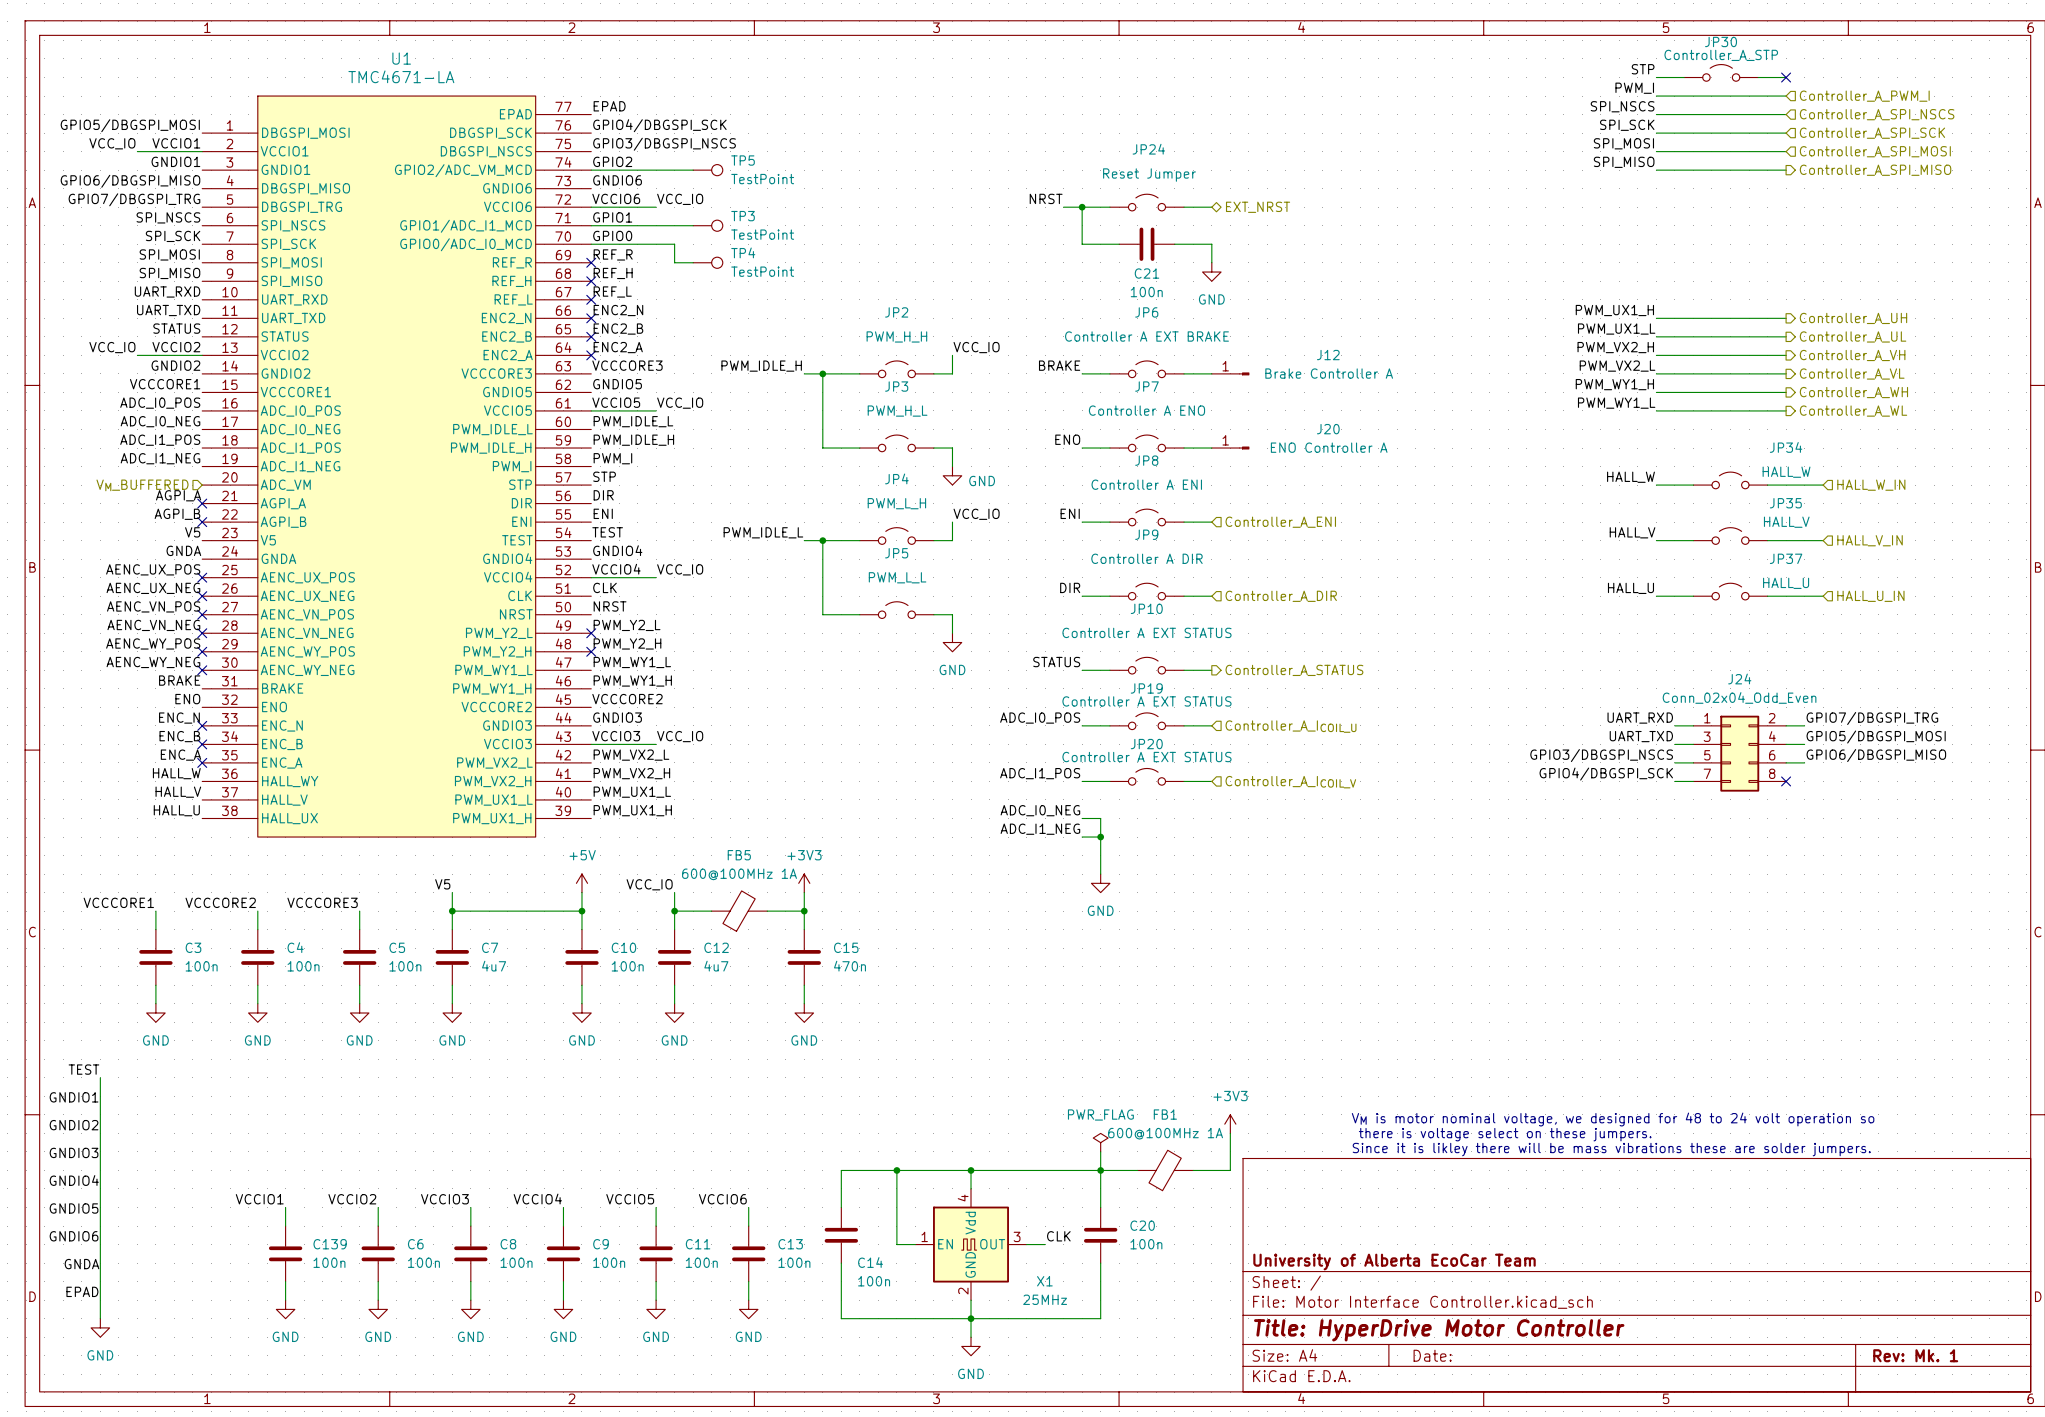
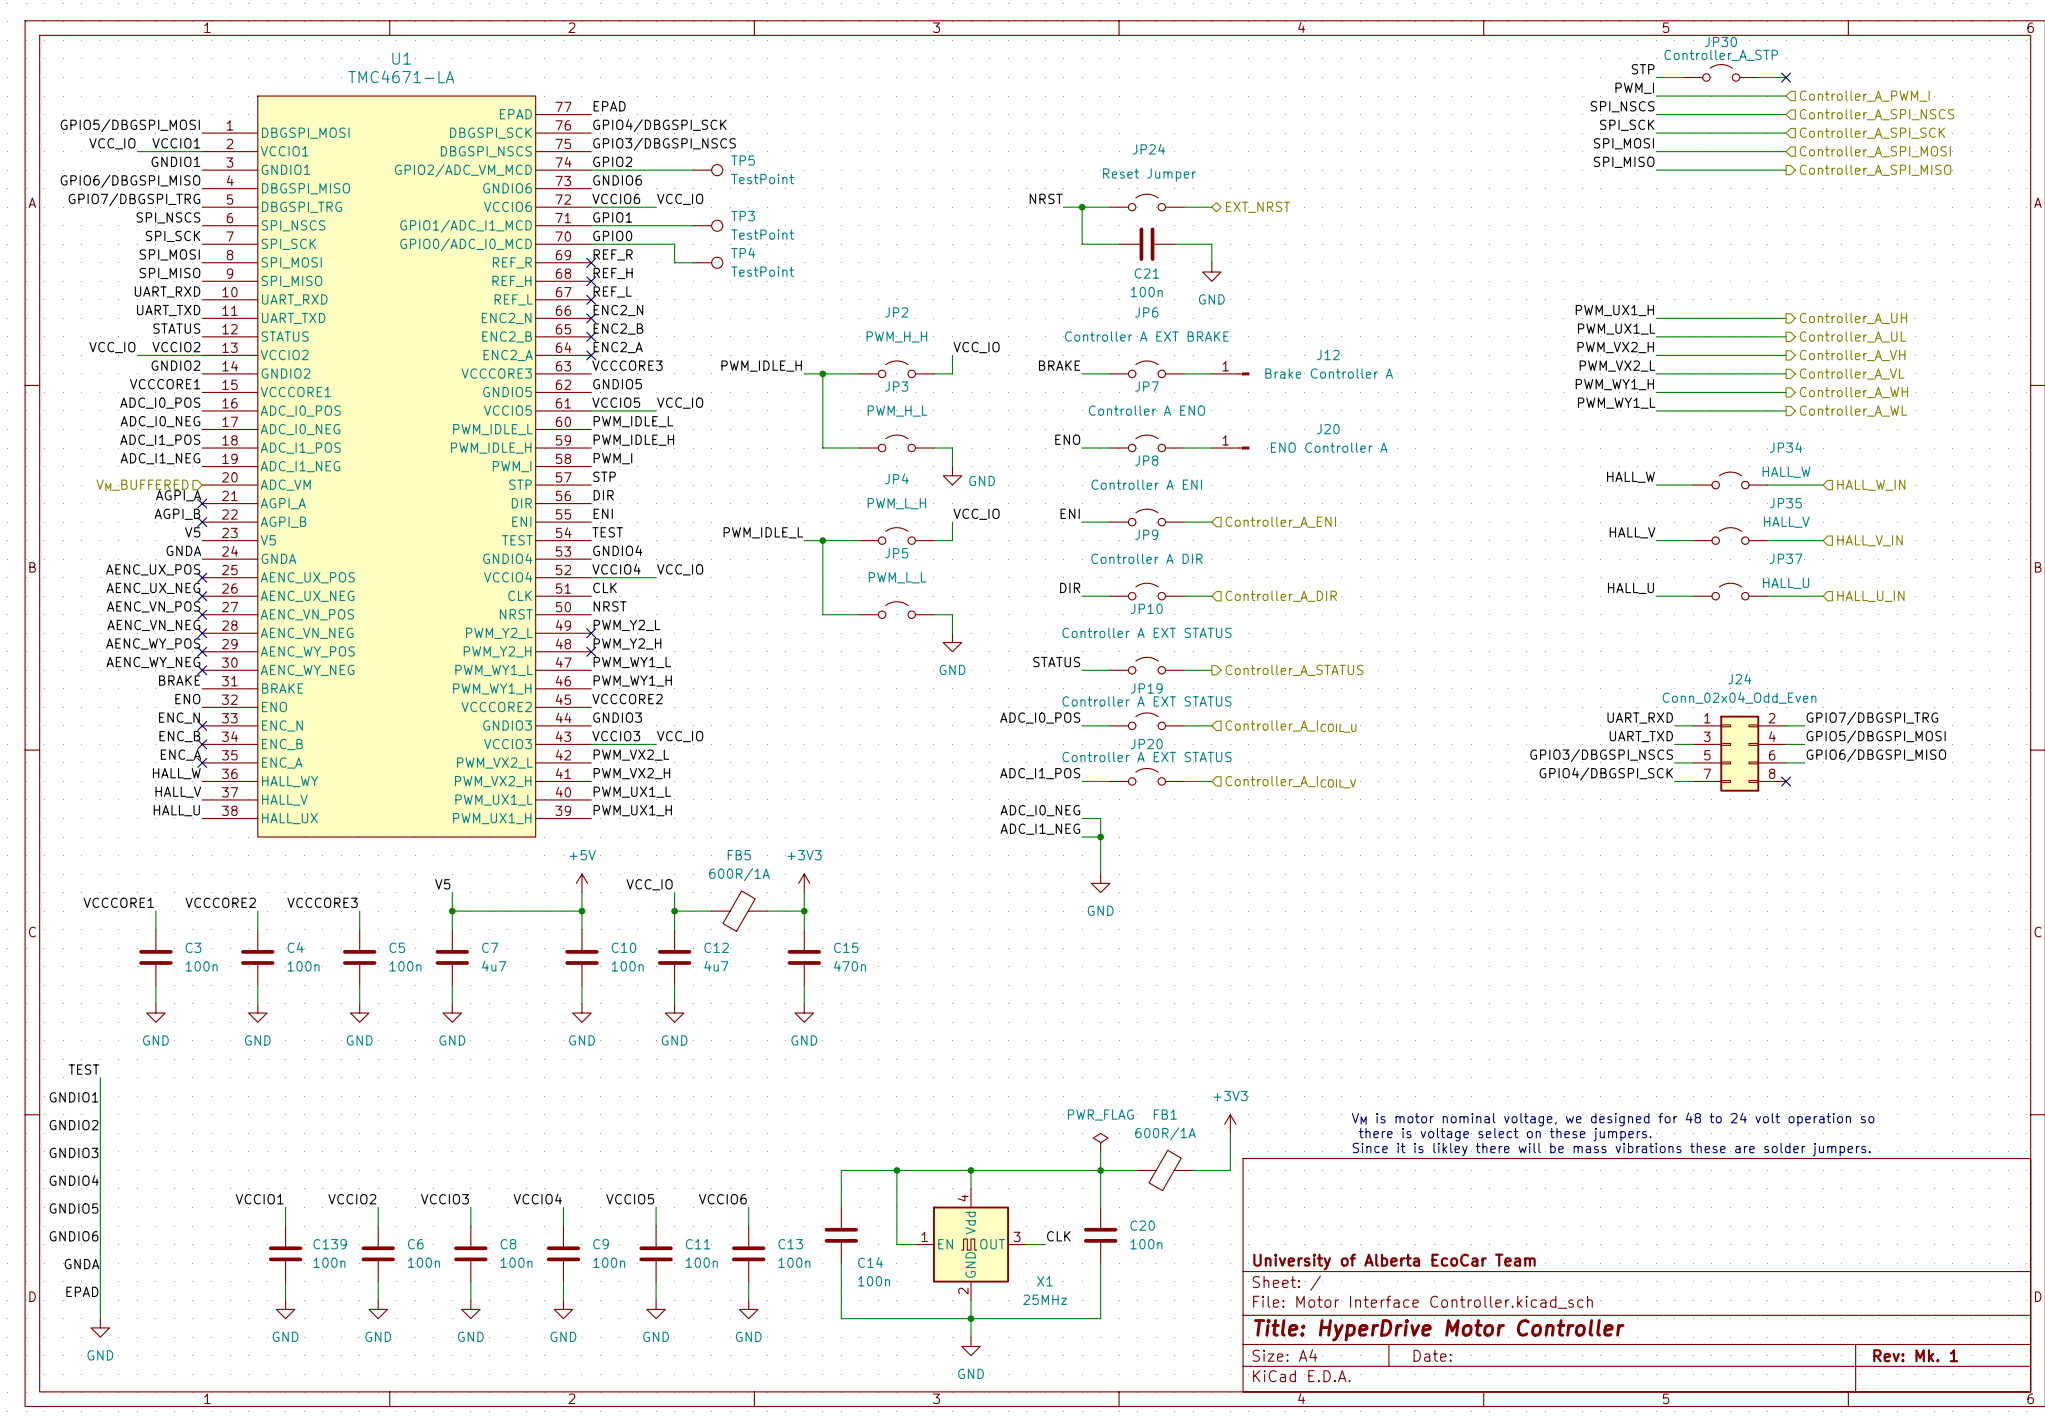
FB5 value: 600@100MHz 1A (739, 874) -> 600R/1A (739, 874)
FB1 value: 600@100MHz 1A (1165, 1133) -> 600R/1A (1165, 1133)

